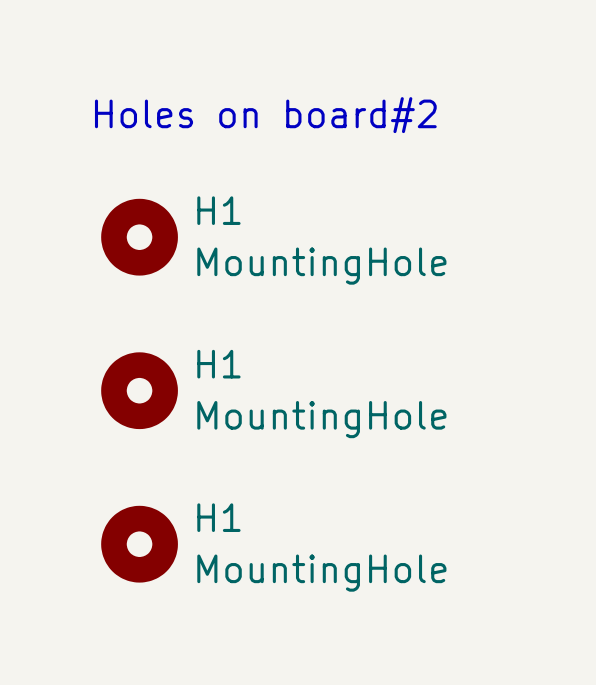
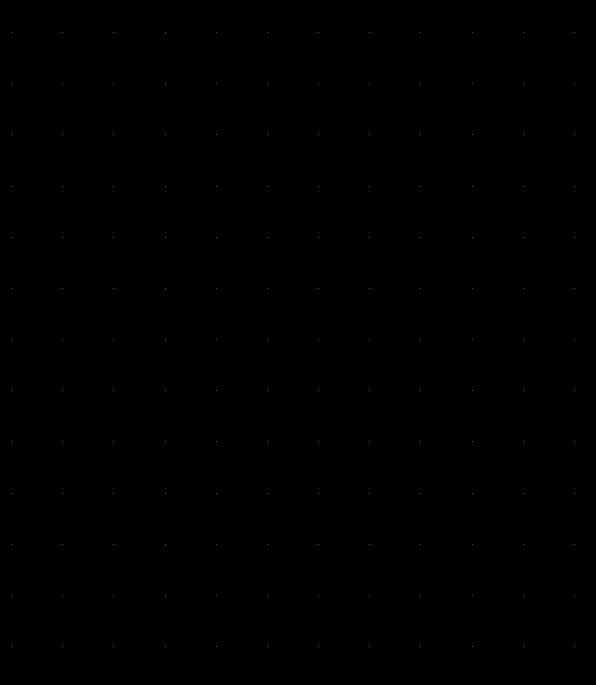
text: Holes on board#2 (265, 115) -> none
H1: MountingHole (139, 237) -> none
H1: MountingHole (139, 390) -> none
H1: MountingHole (139, 544) -> none

